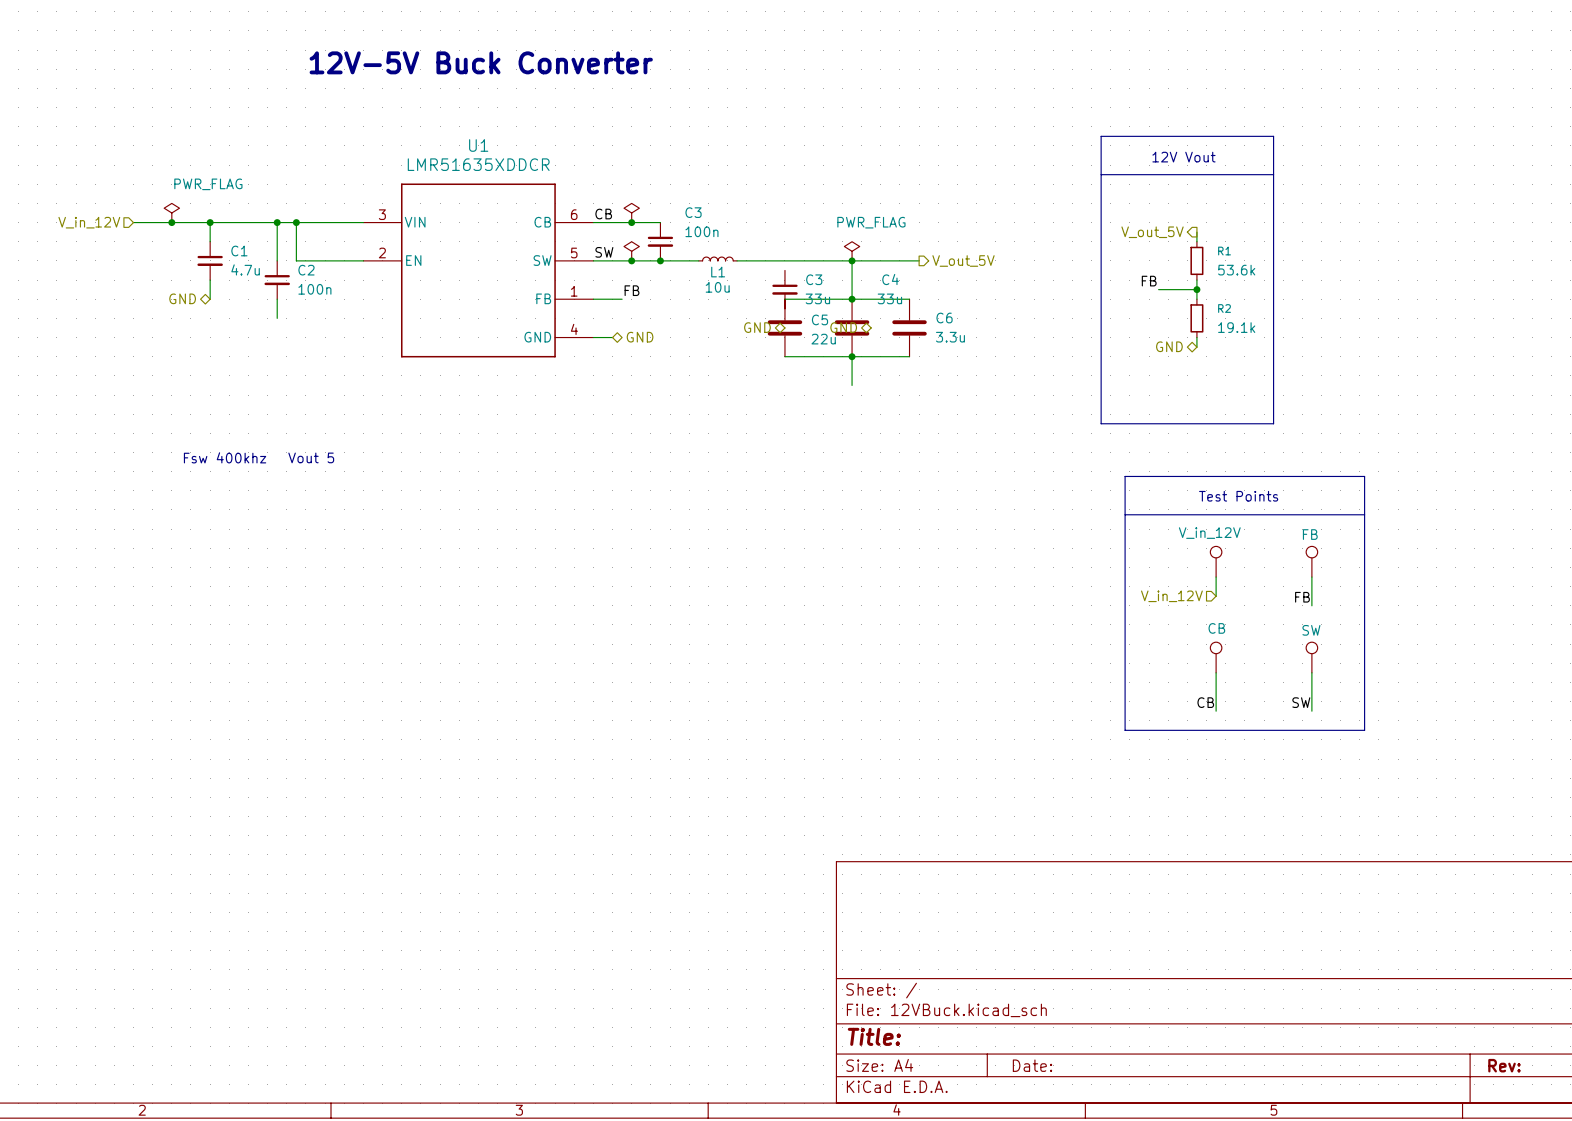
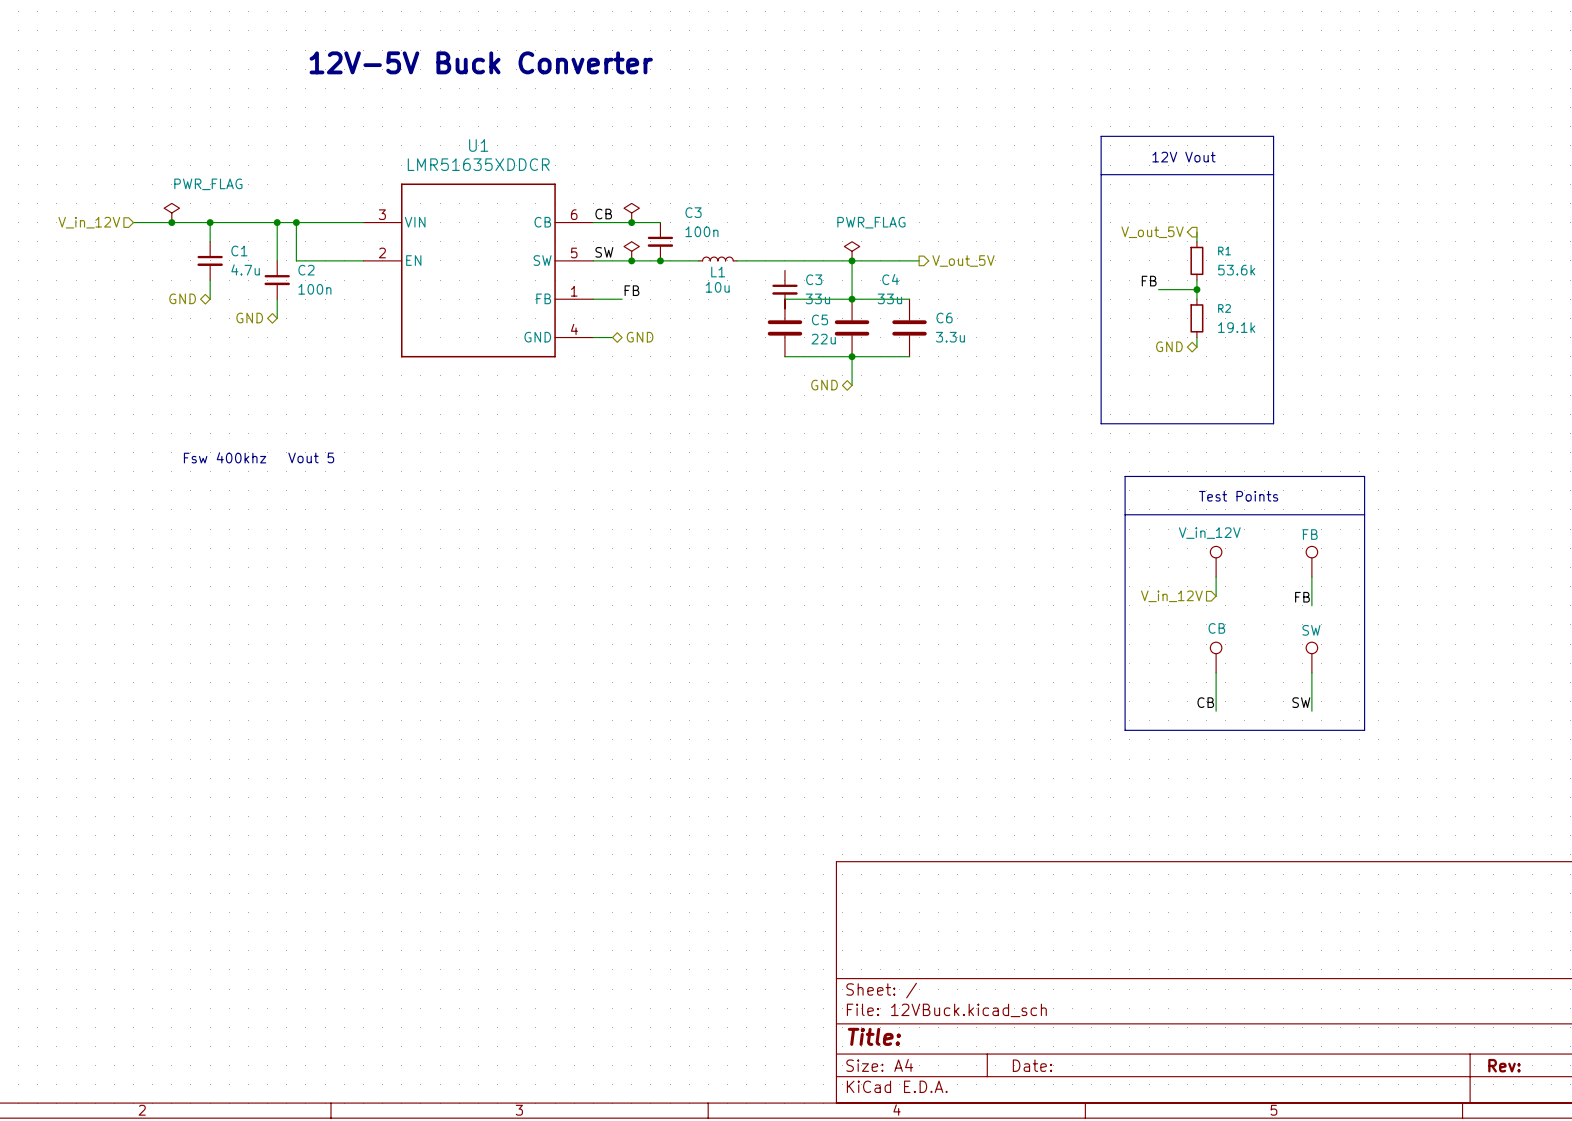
hierarchical label: none -> GND (249, 318)
hierarchical label: GND (757, 327) -> none
hierarchical label: GND (843, 327) -> none
hierarchical label: none -> GND (824, 385)

